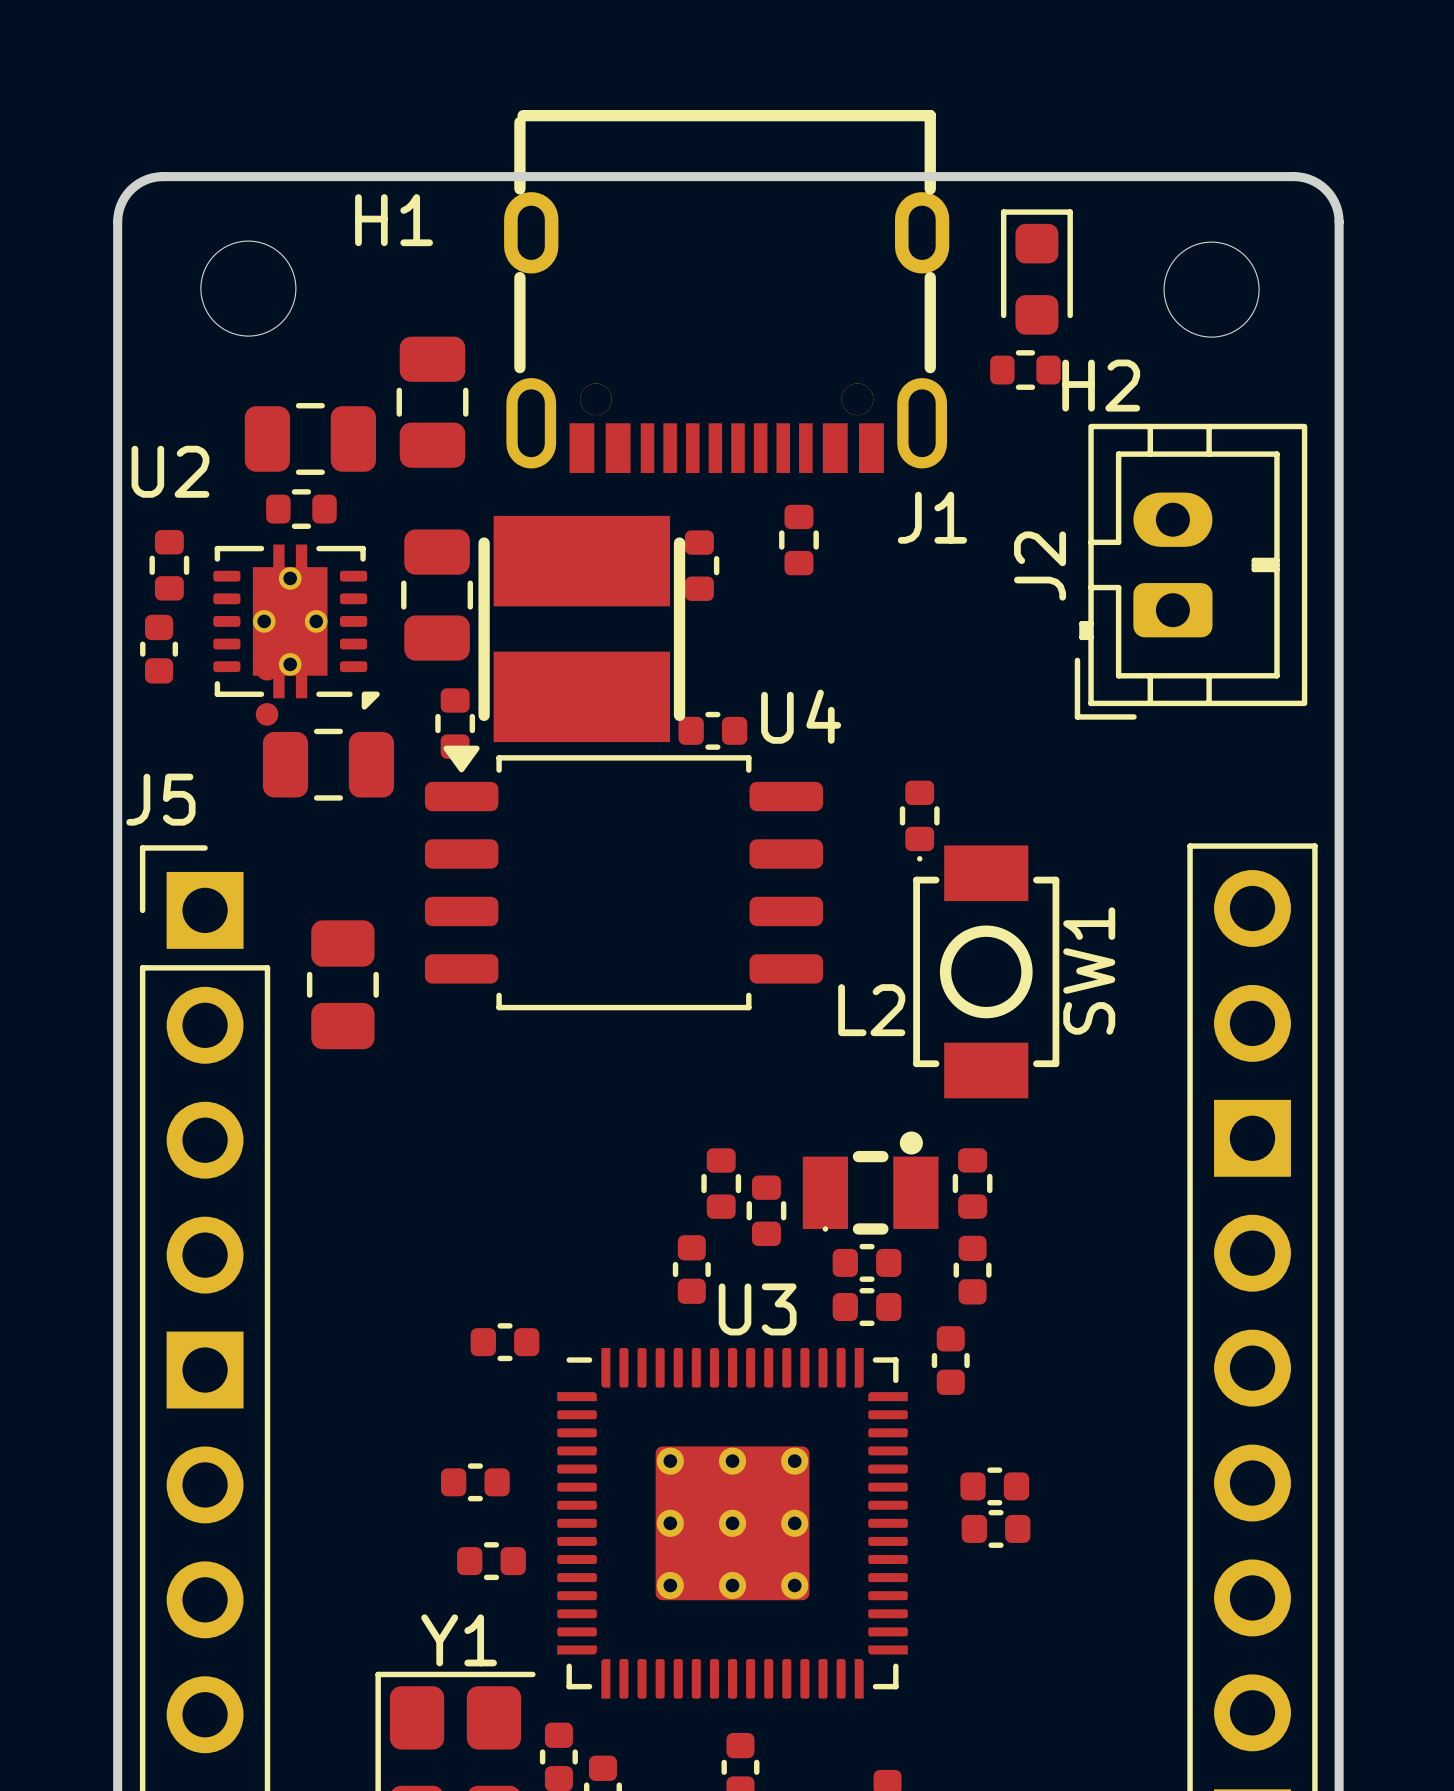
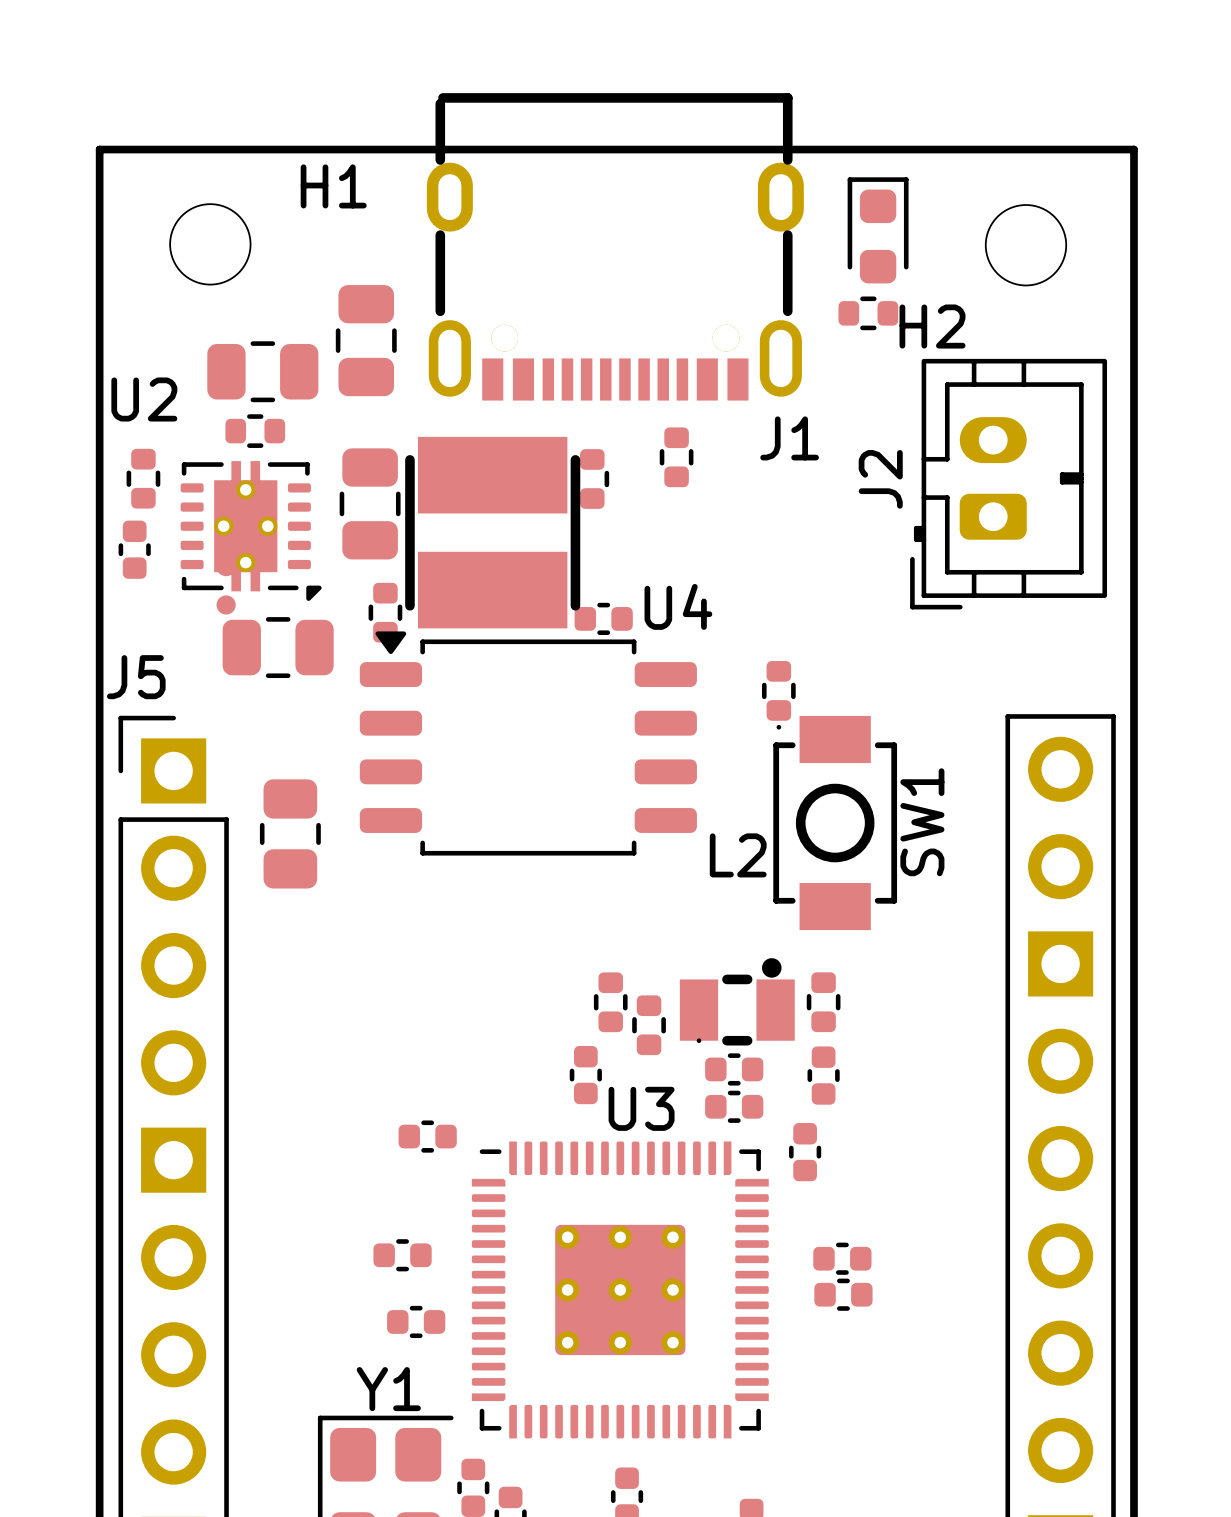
board edge: (162, 176) (143, 181) (130, 189) (122, 202) (117, 221) -> (137, 149) (99, 149) (99, 187)
board edge: (1293, 176) (1308, 179) (1325, 189) (1334, 202) (1339, 221) -> (1095, 149) (1133, 149) (1133, 187)

